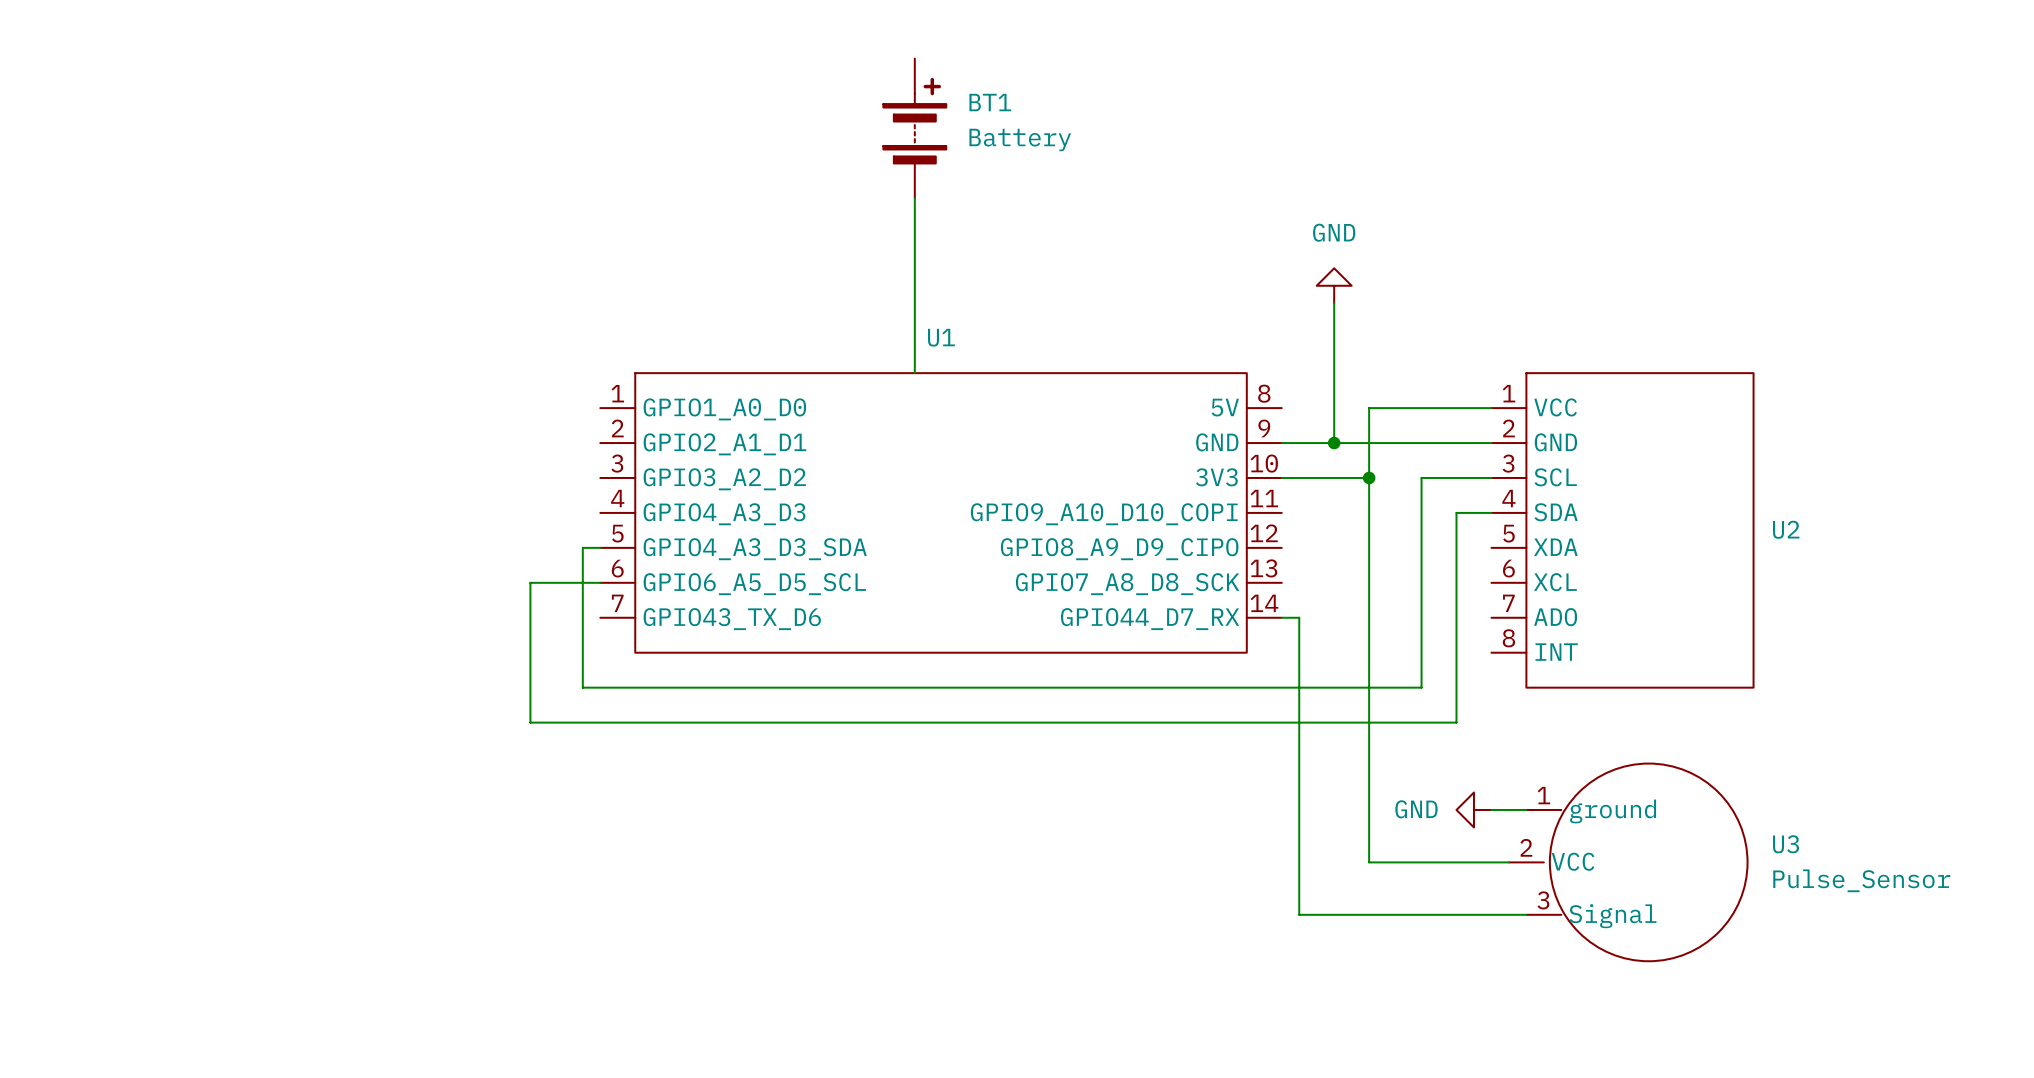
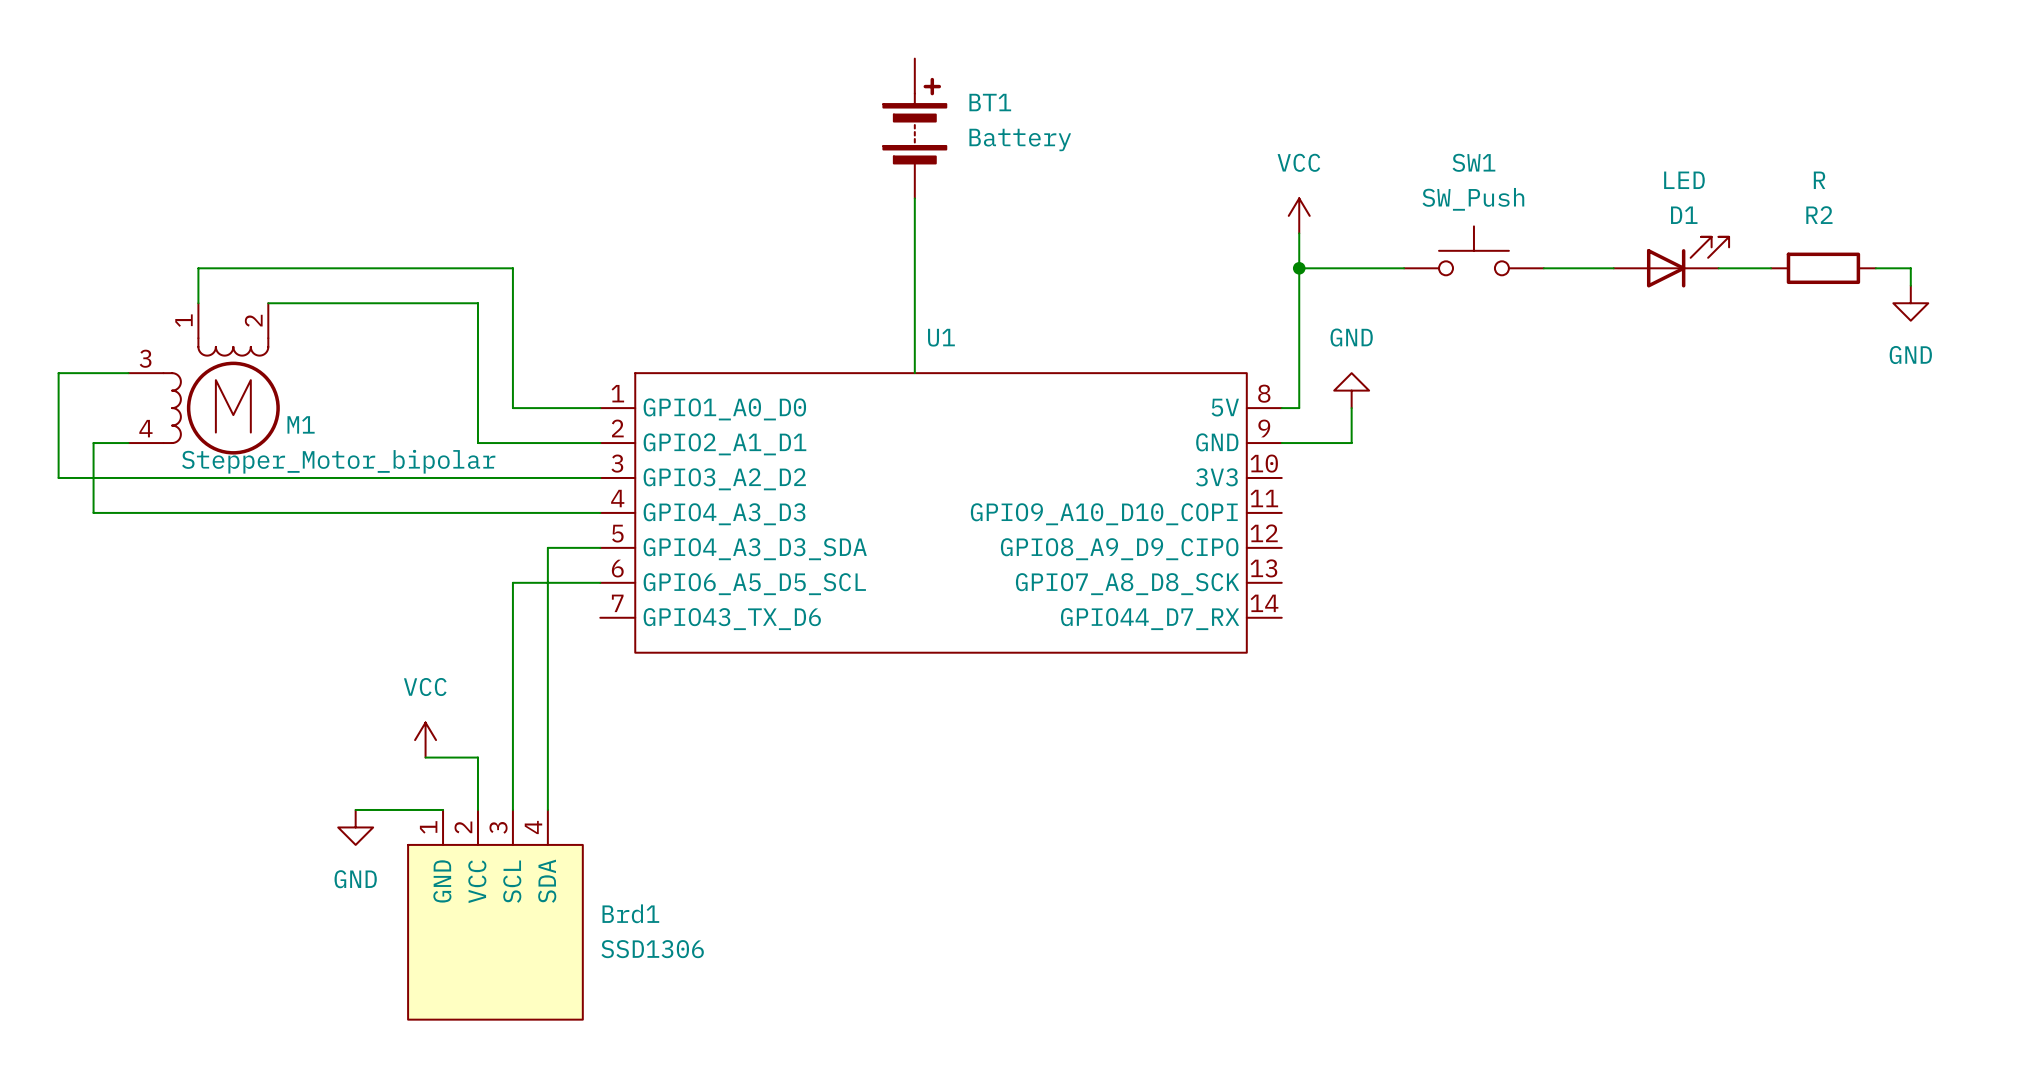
power symbol: none -> VCC (1299, 215)
wire: none -> (1299, 233) (1299, 408) (1281, 408)
SW1: none -> SW_Push (1473, 250)
D1: none -> LED (1671, 262)
wire: none -> (1299, 268) (1404, 268)
junction: none -> (1299, 268)
wire: none -> (1543, 268) (1613, 268)
wire: none -> (1718, 268) (1771, 268)
R2: none -> R (1823, 268)
wire: none -> (1875, 268) (1910, 268) (1910, 285)
power symbol position: GND (1334, 285) -> GND (1351, 390)
wire: none -> (198, 303) (198, 268) (512, 268) (512, 408) (600, 408)
wire: none -> (268, 303) (477, 303) (477, 443) (600, 443)
wire: (1334, 303) (1334, 443) -> none
power symbol: none -> GND (1910, 303)
wire: none -> (128, 373) (58, 373) (58, 477) (600, 477)
M1: none -> Stepper_Motor_bipolar (204, 378)
wire: (1491, 408) (1369, 408) (1369, 862) (1508, 862) -> none
wire: none -> (128, 443) (93, 443) (93, 512) (600, 512)
junction: (1334, 443) -> none
wire: (1351, 443) (1491, 443) -> (1351, 443) (1351, 408)
wire: (1281, 477) (1369, 477) -> none
junction: (1369, 477) -> none
wire: (1491, 477) (1421, 477) (1421, 687) (582, 687) (582, 547) -> (547, 809) (547, 547) (582, 547)
wire: (1491, 512) (1456, 512) (1456, 722) (530, 722) (530, 582) -> (512, 809) (512, 582) (530, 582)
U2: (1622, 530) -> none
wire: (1281, 617) (1299, 617) (1299, 914) (1526, 914) -> none
power symbol: none -> VCC (425, 740)
wire: none -> (425, 757) (477, 757) (477, 809)
wire: none -> (355, 809) (443, 809)
power symbol: GND (1473, 809) -> none
wire: (1491, 809) (1526, 809) -> none
power symbol: none -> GND (355, 827)
U3: Pulse_Sensor (1628, 862) -> none
Brd1: none -> SSD1306 (495, 914)

